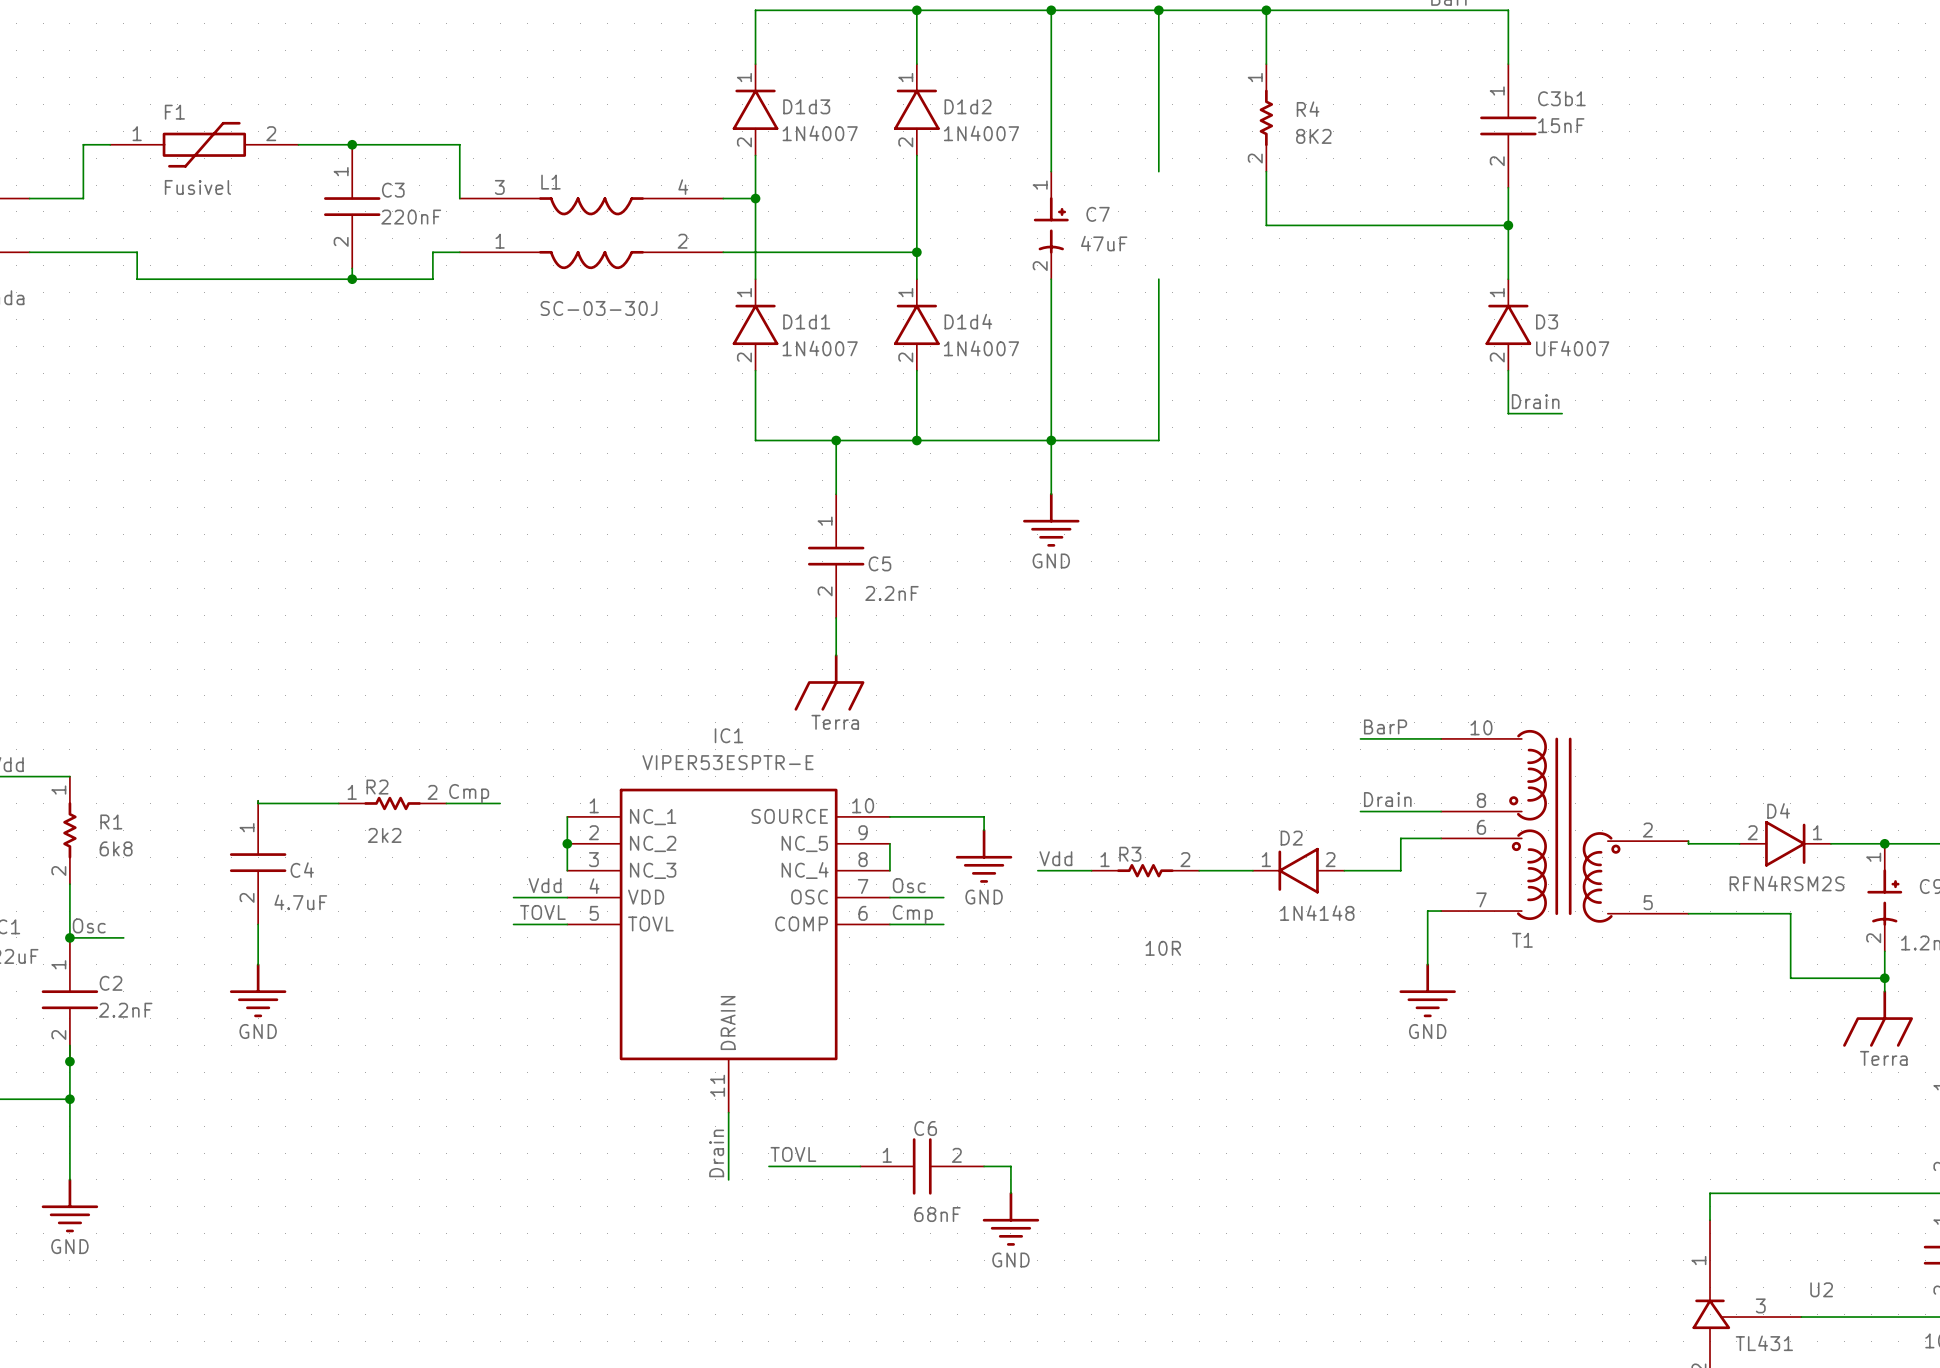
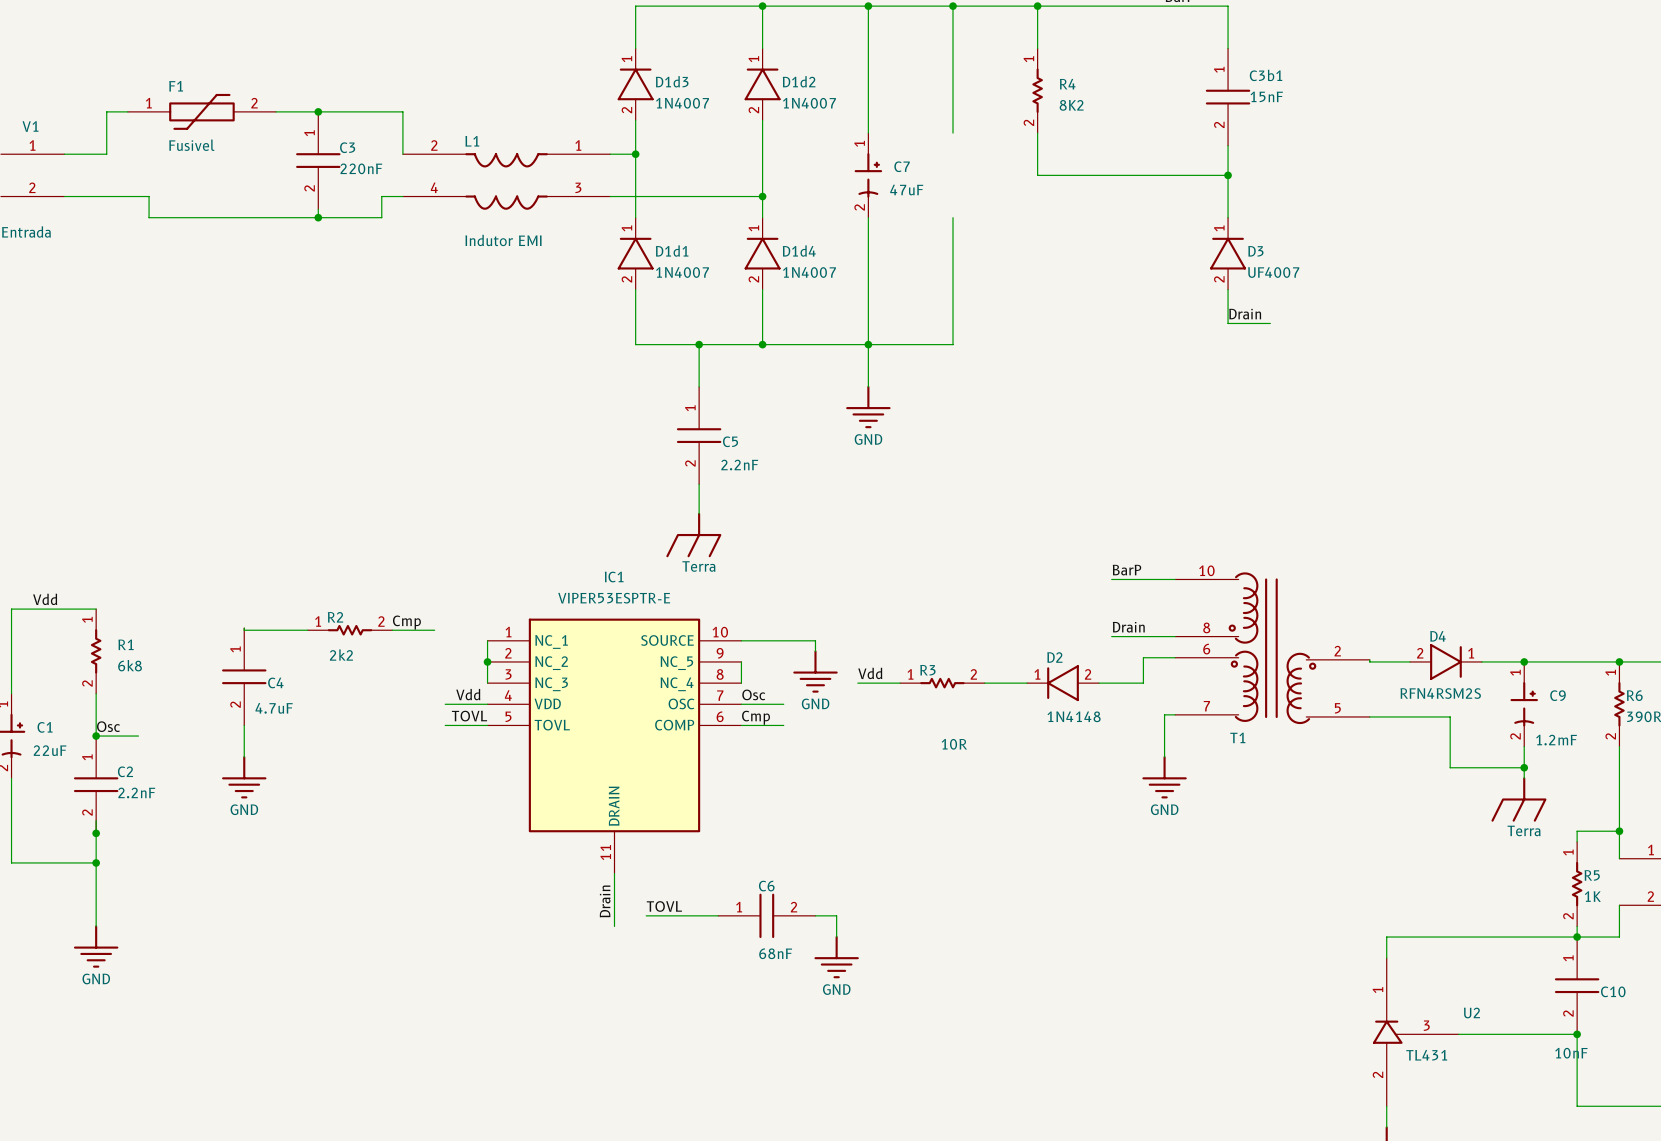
L1 pin number: 3 (499, 187) -> 2 (434, 145)
L1 pin number: 4 (683, 187) -> 1 (578, 145)
L1 pin number: 1 (500, 241) -> 4 (434, 187)
L1 pin number: 2 (682, 241) -> 3 (578, 187)
L1 value: SC-03-30J (598, 308) -> Indutor EMI (503, 240)

